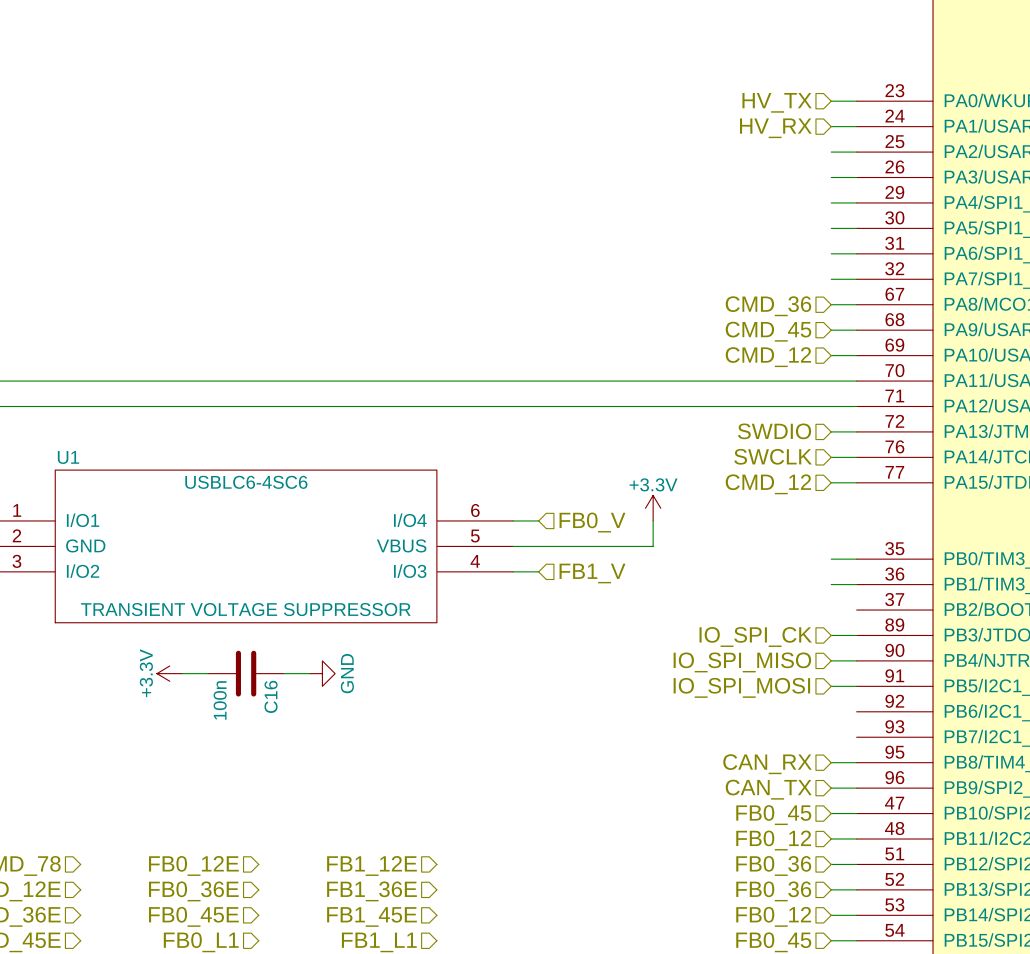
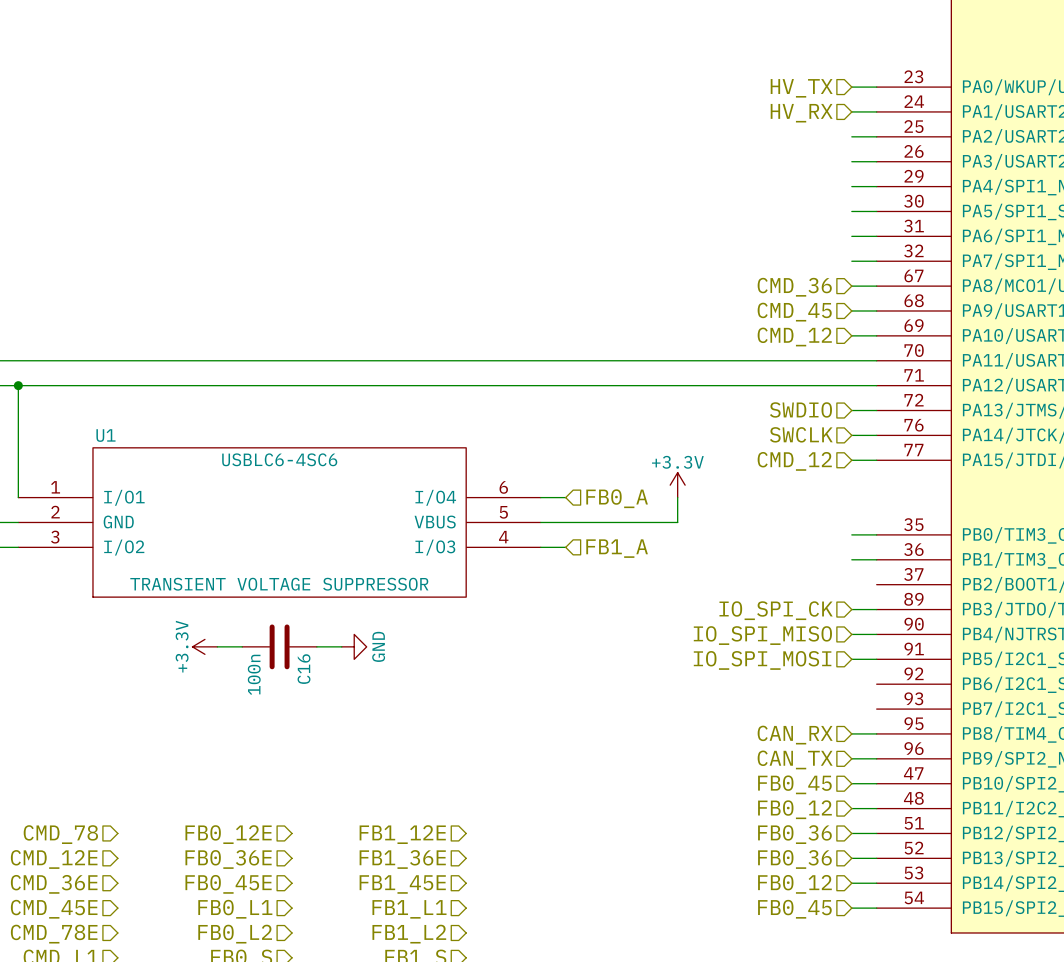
hierarchical label: FB0_V (592, 522) -> FB0_A (617, 498)
hierarchical label: FB1_V (592, 573) -> FB1_A (617, 548)

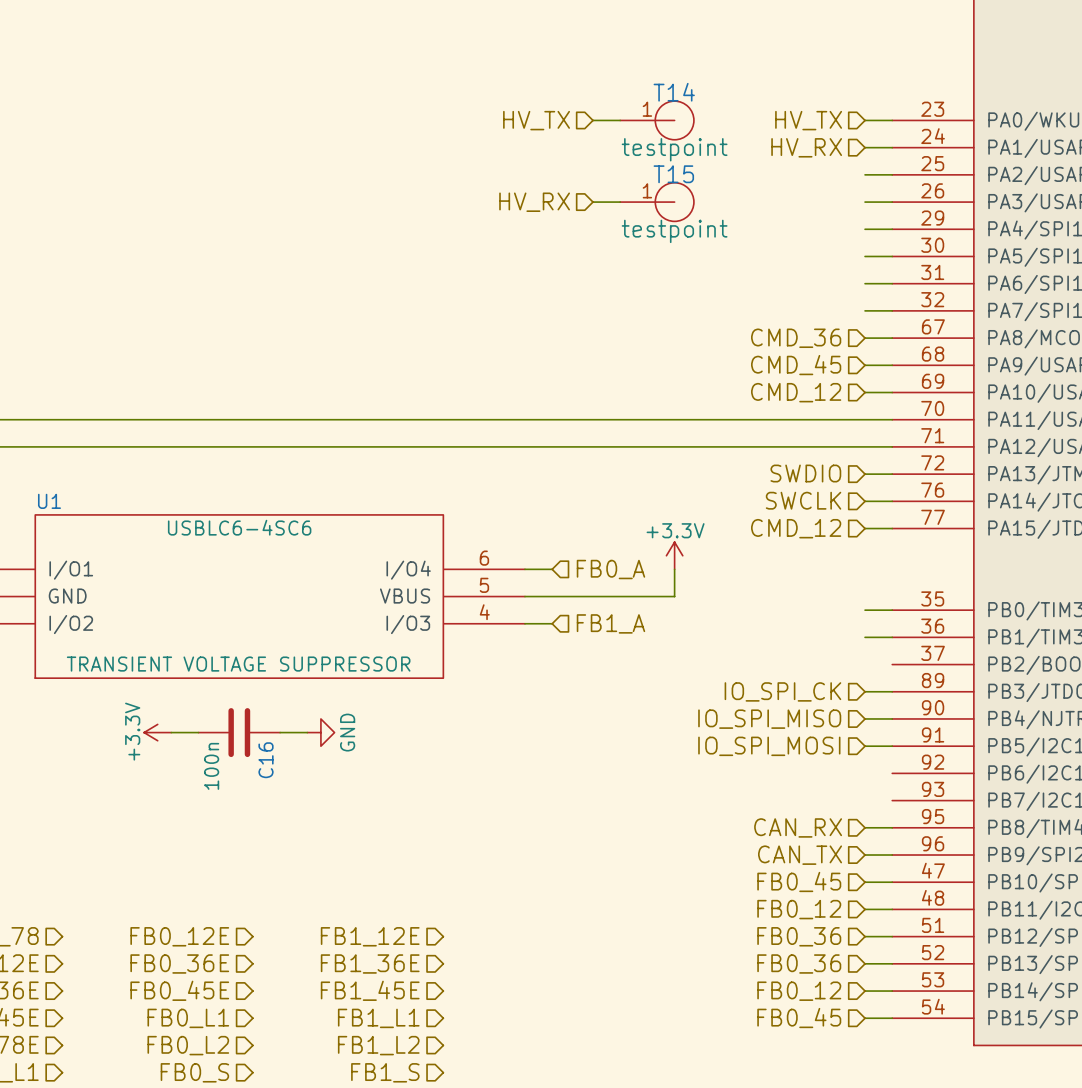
wire: none -> (592, 120) (620, 120)
T14: none -> testpoint (657, 120)
hierarchical label: none -> HV_TX (536, 120)
wire: none -> (592, 202) (620, 202)
T15: none -> testpoint (657, 202)
hierarchical label: none -> HV_RX (534, 202)

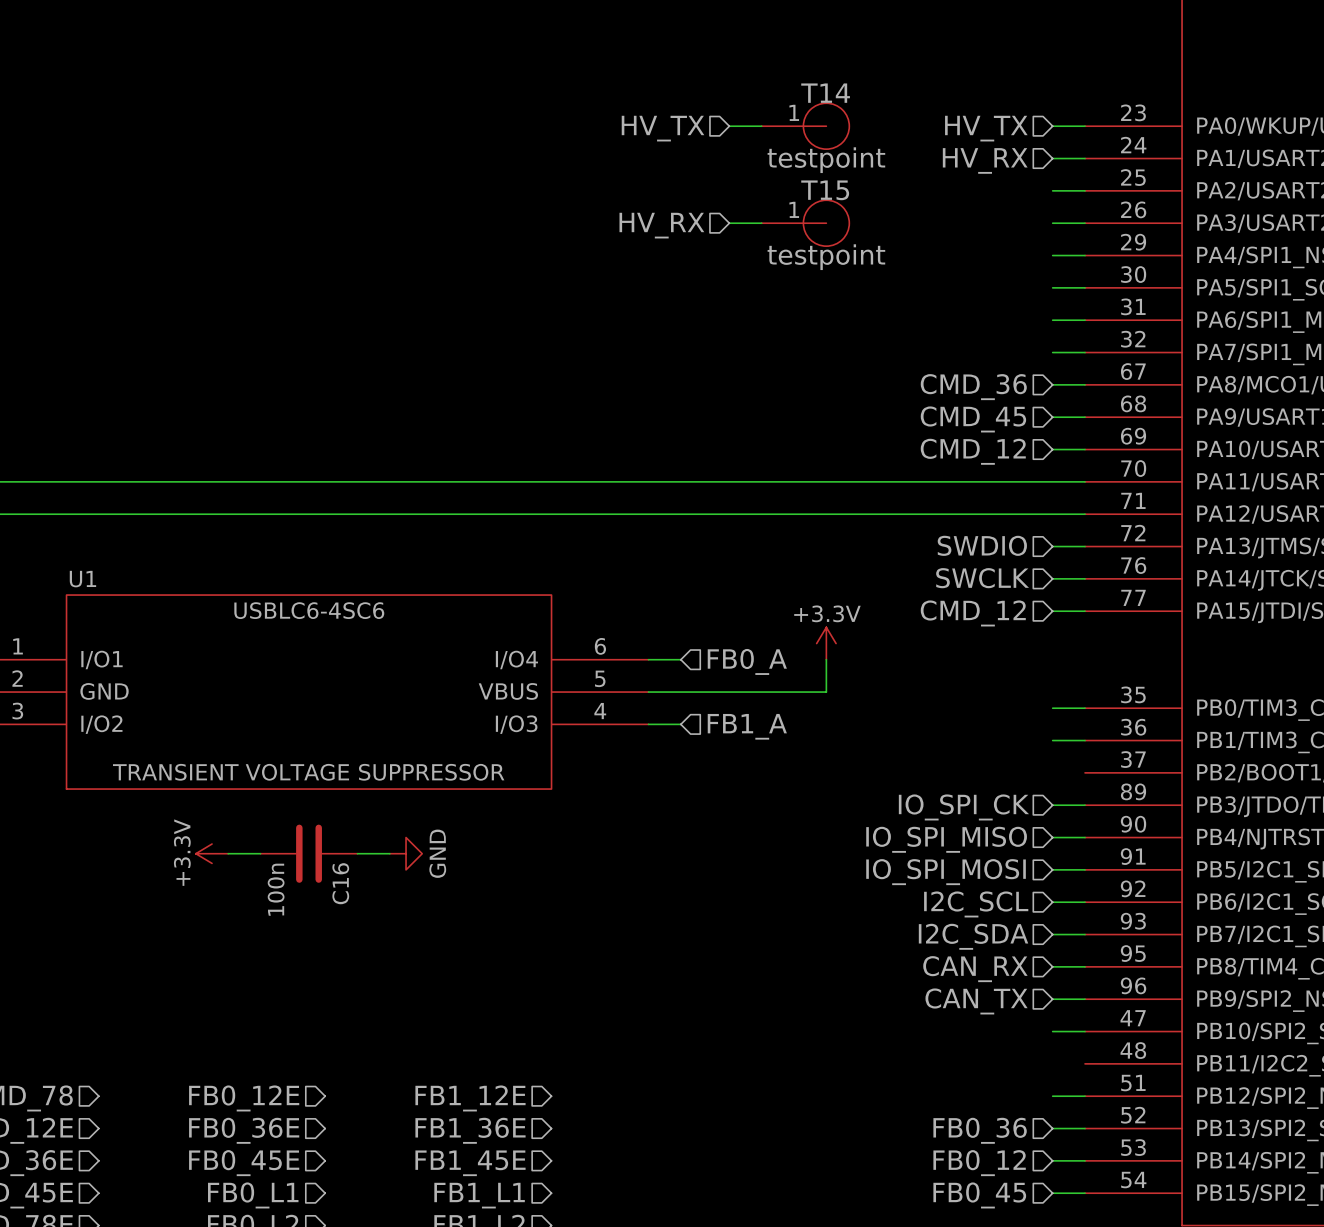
hierarchical label: none -> I2C_SCL (976, 904)
wire: none -> (1052, 902) (1085, 902)
hierarchical label: none -> I2C_SDA (973, 936)
hierarchical label: FB0_45 (799, 881) -> none
hierarchical label: FB0_12 (799, 909) -> none
wire: (865, 909) (892, 909) -> (1052, 934) (1085, 934)
hierarchical label: FB0_36 (799, 936) -> none

